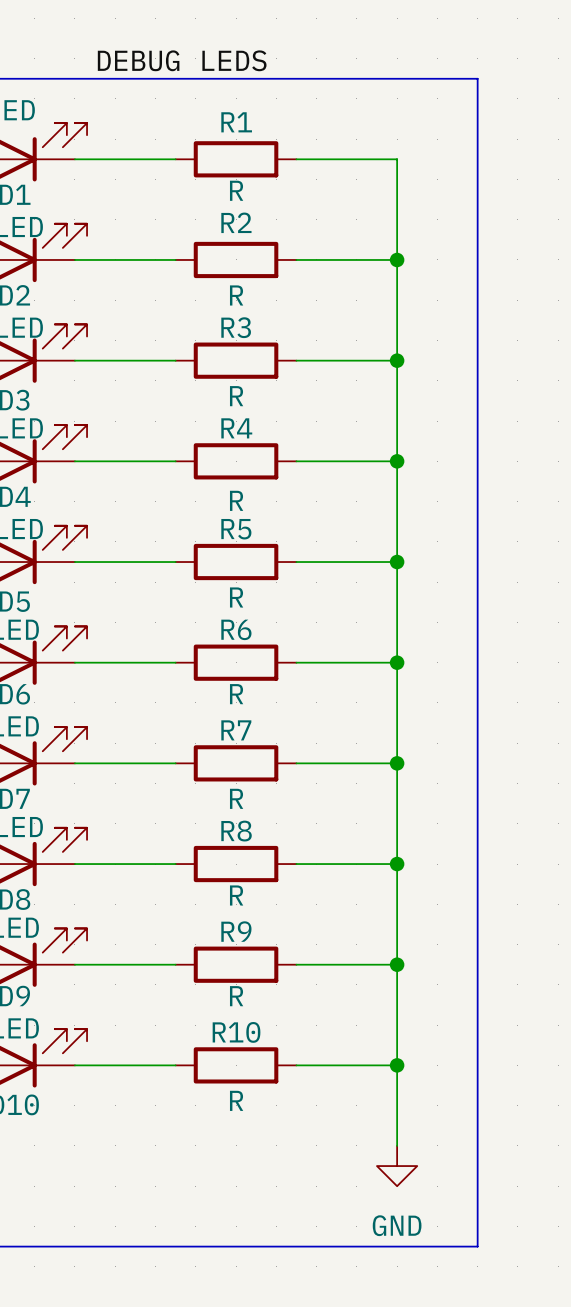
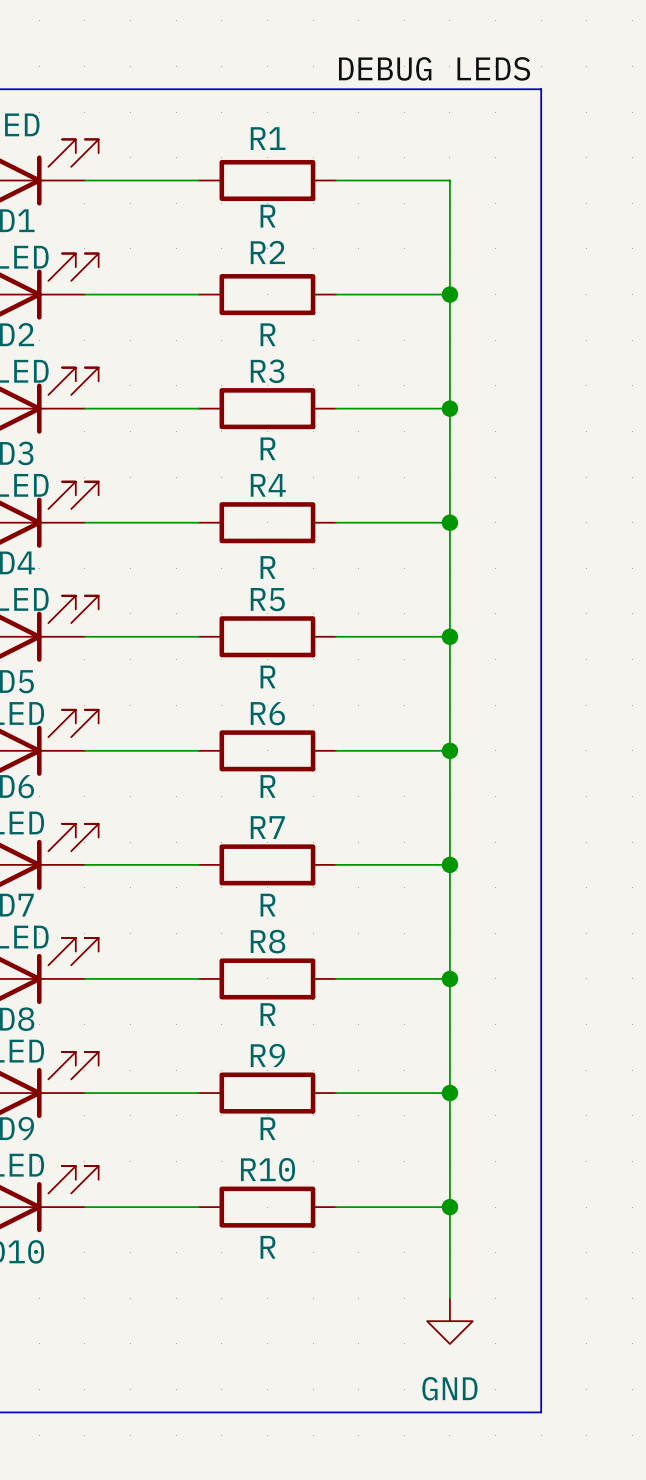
label position: DEBUG LEDS (182, 60) -> DEBUG LEDS (434, 68)

